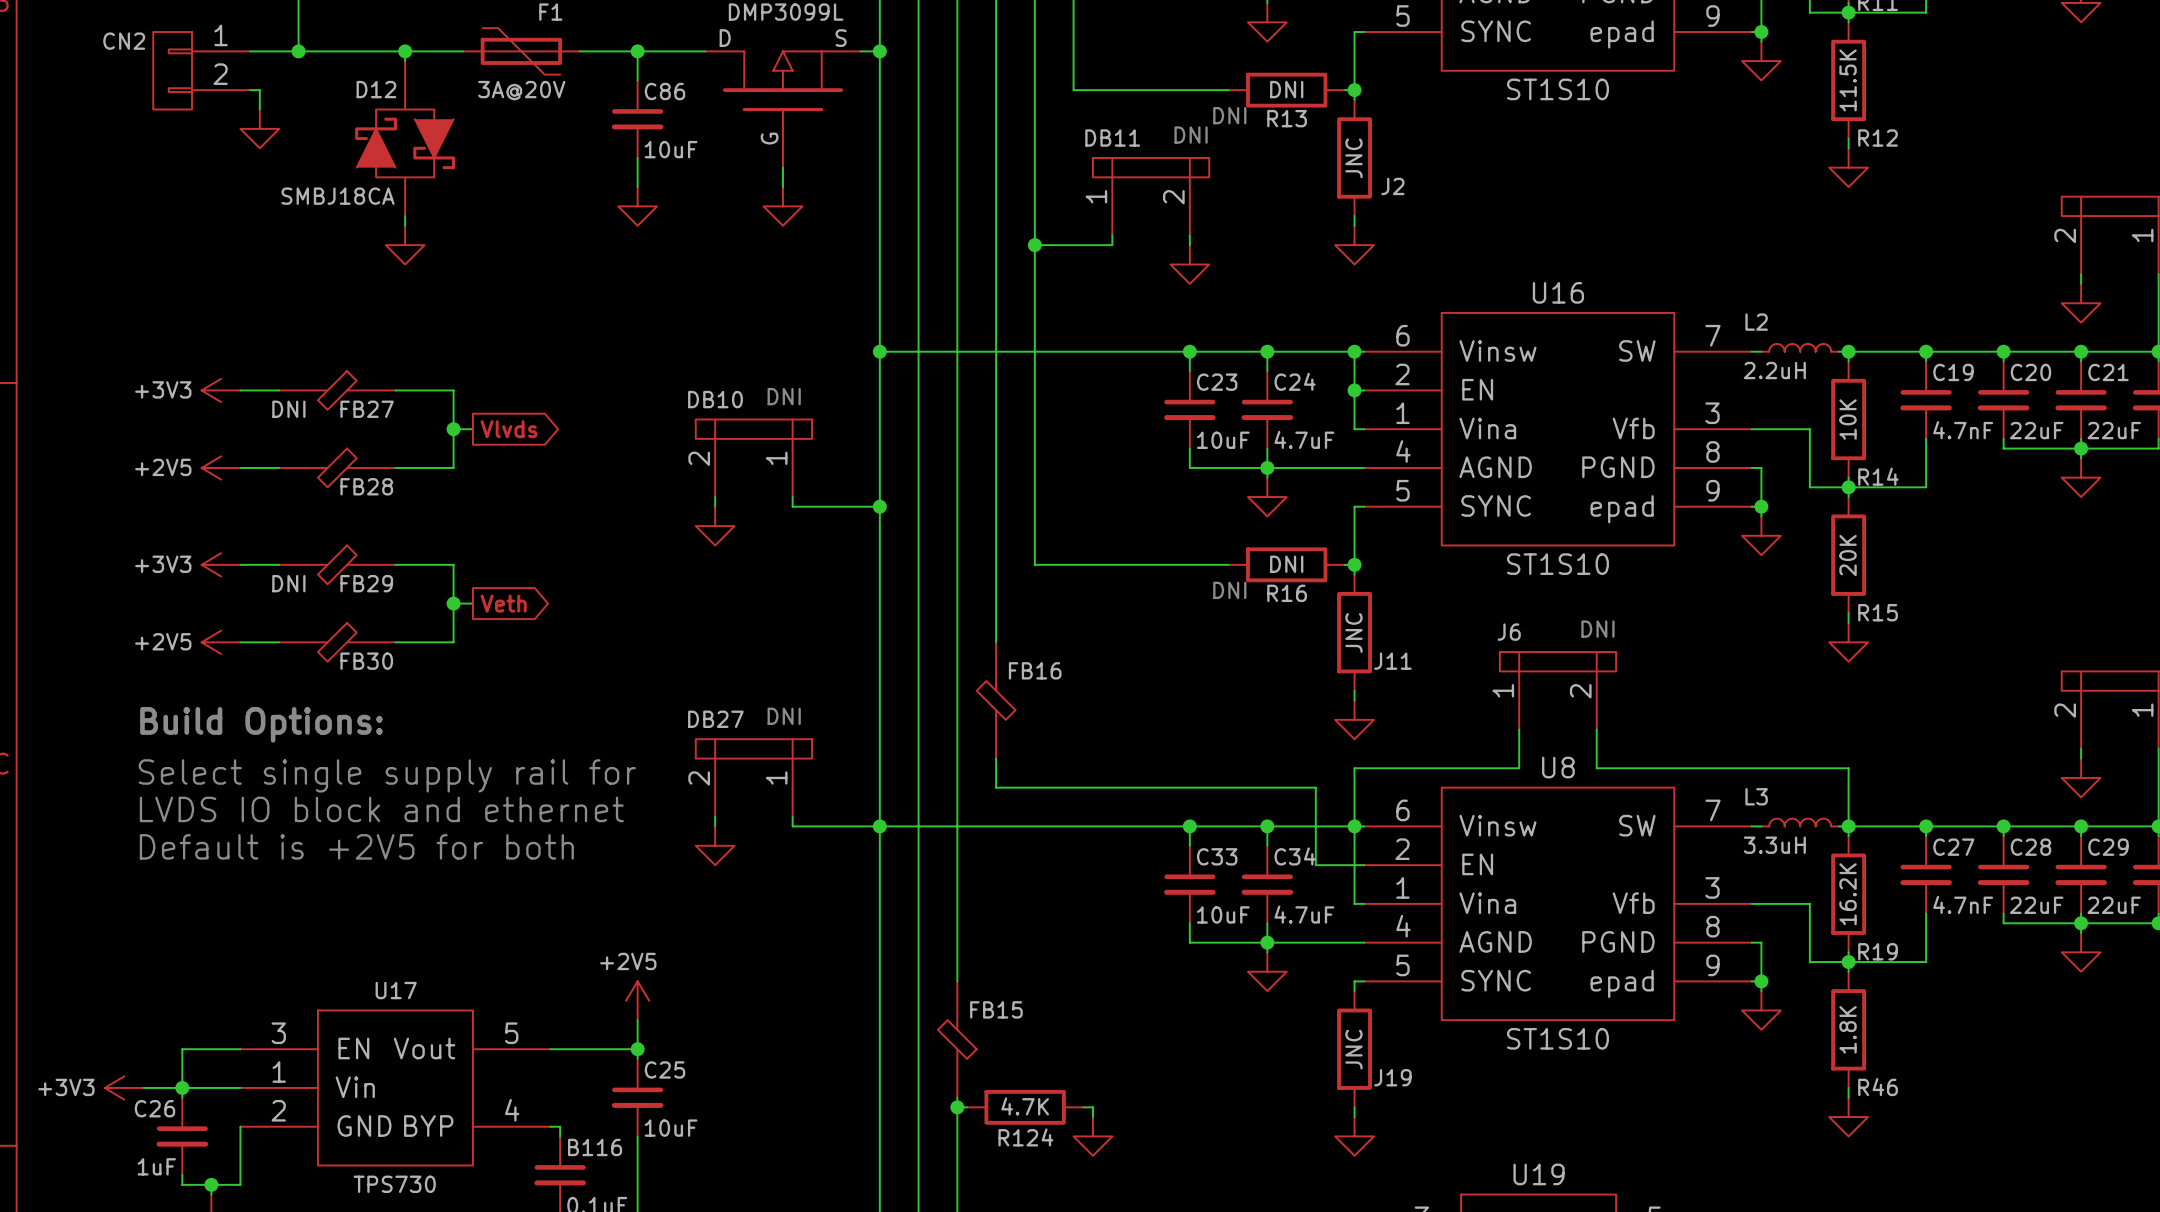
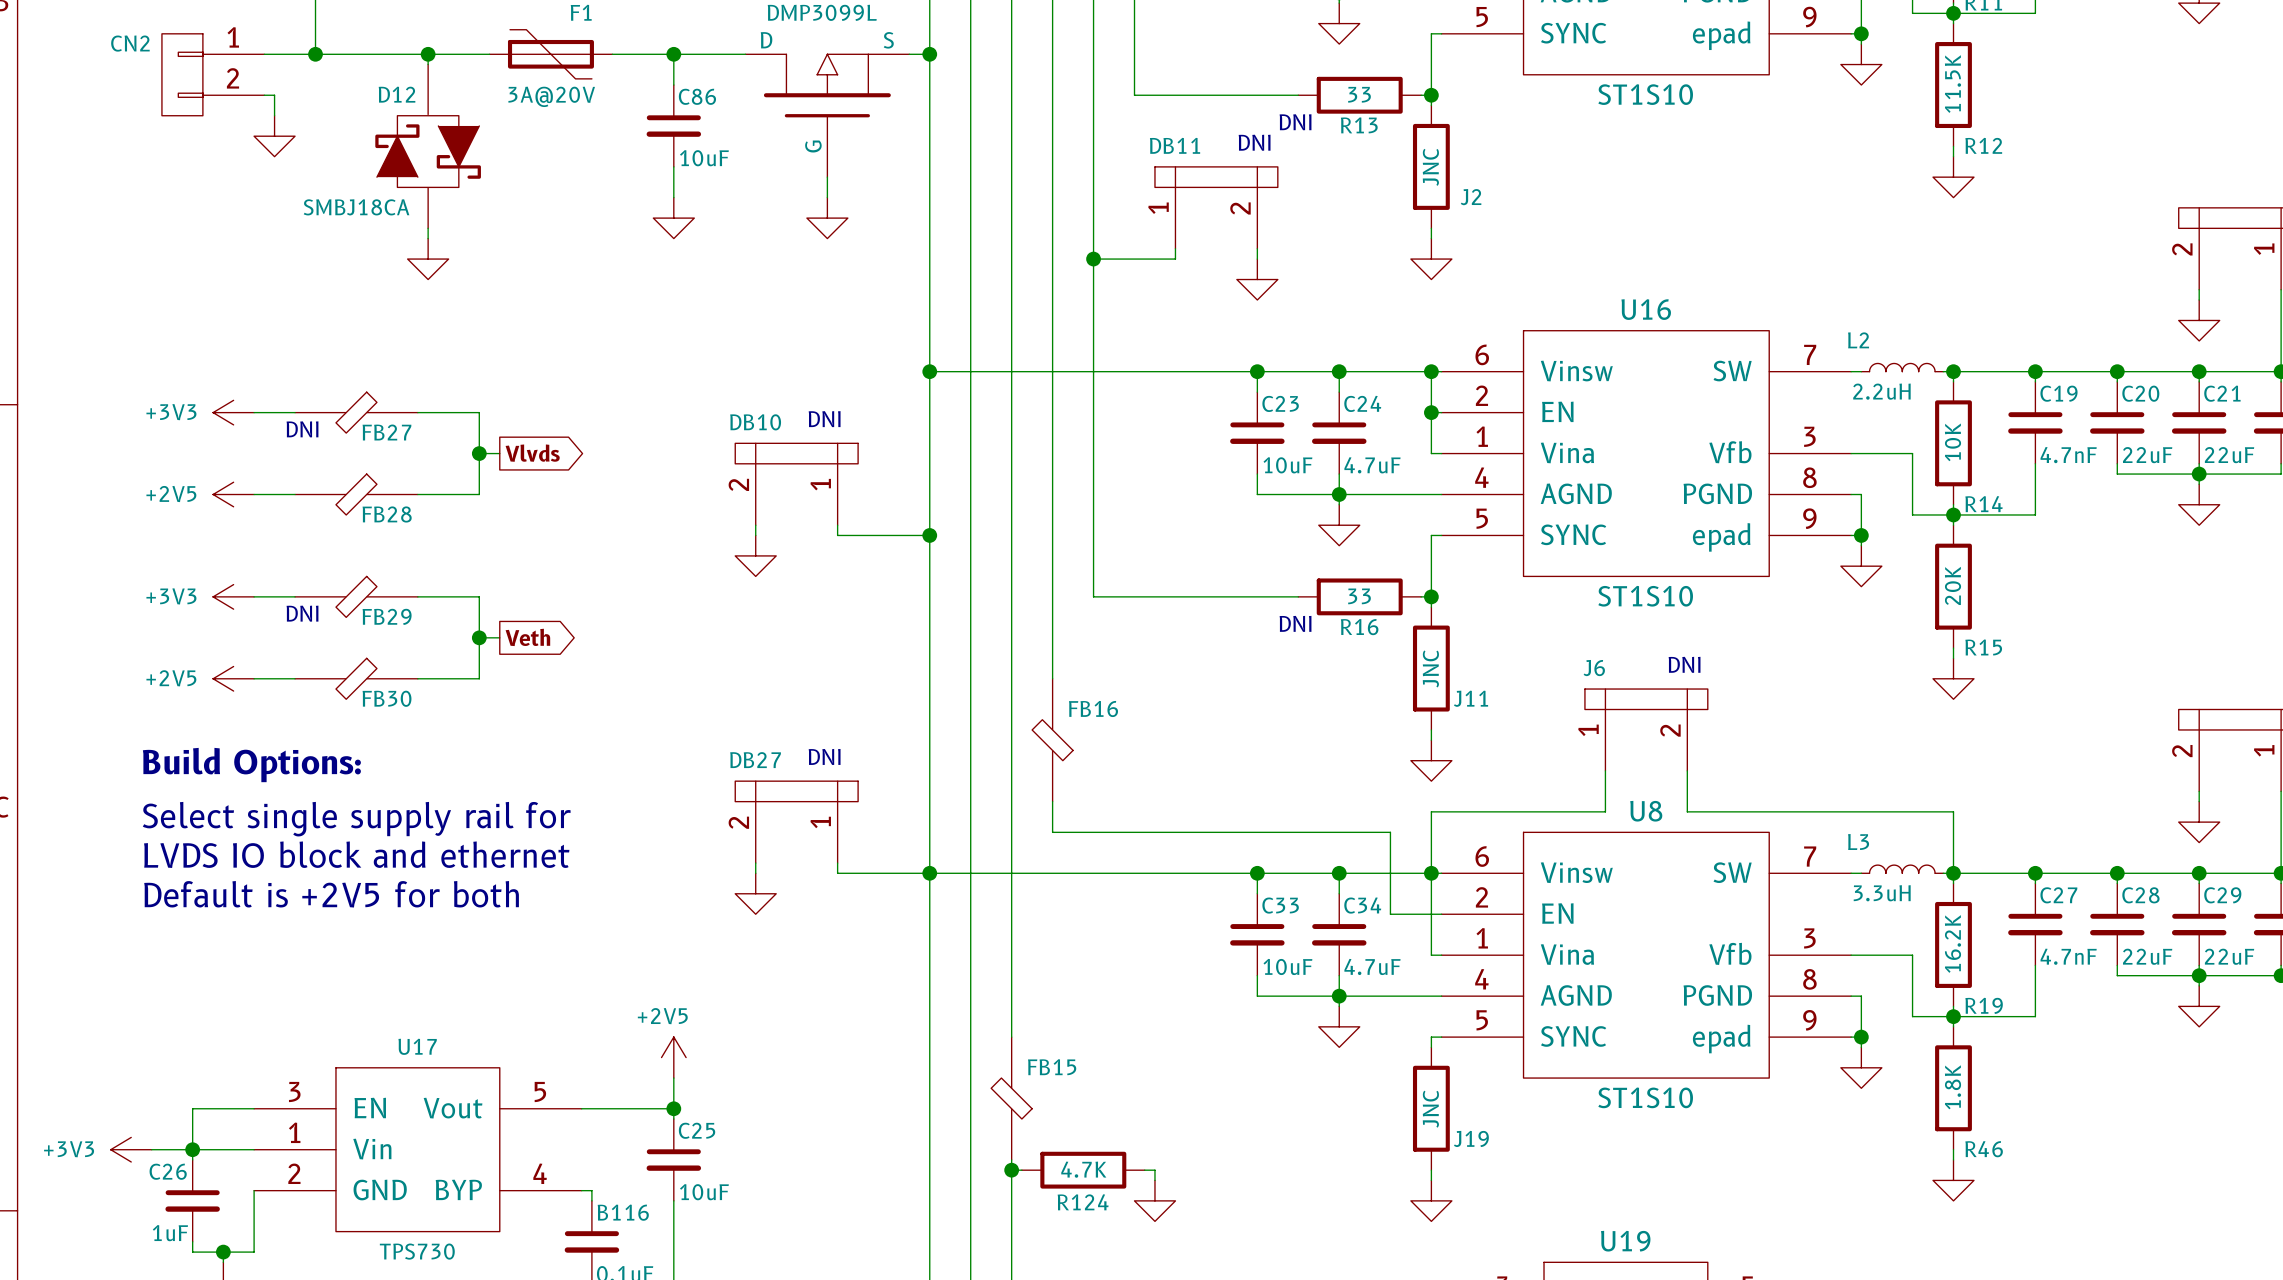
R13 value: DNI (1286, 89) -> 33 (1359, 94)
text: none -> DNI (302, 429)
FB27 value: DNI (288, 409) -> none
R16 value: DNI (1286, 564) -> 33 (1359, 596)
text: none -> DNI (302, 613)
FB29 value: DNI (288, 583) -> none

